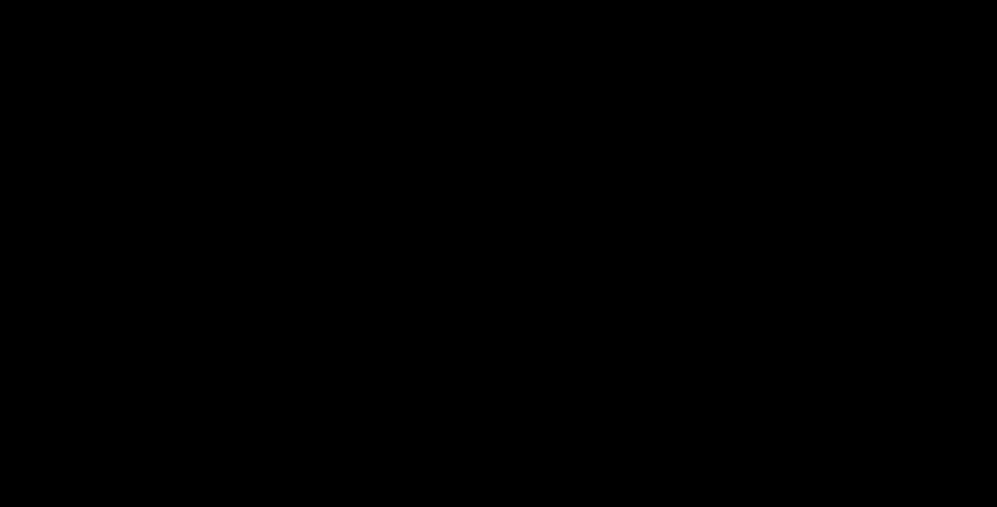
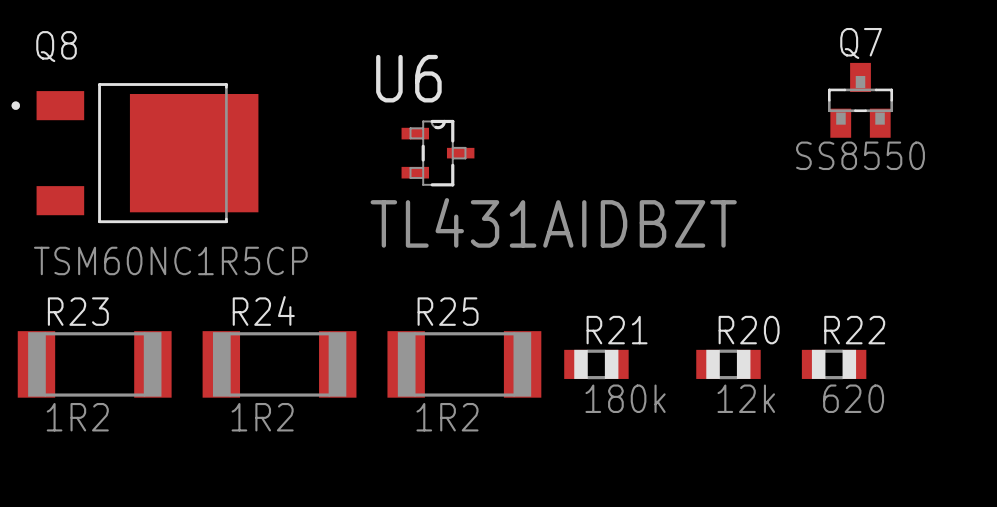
Q7: none -> SS8550 (860, 100)
Q8: none -> TSM60NC1R5CP (135, 153)
U6: none -> TL431AIDBZT (437, 153)
R23: none -> 1R2 (94, 364)
R24: none -> 1R2 (279, 364)
R25: none -> 1R2 (464, 364)
R21: none -> 180k (596, 364)
R20: none -> 12k (728, 364)
R22: none -> 620 (834, 364)

